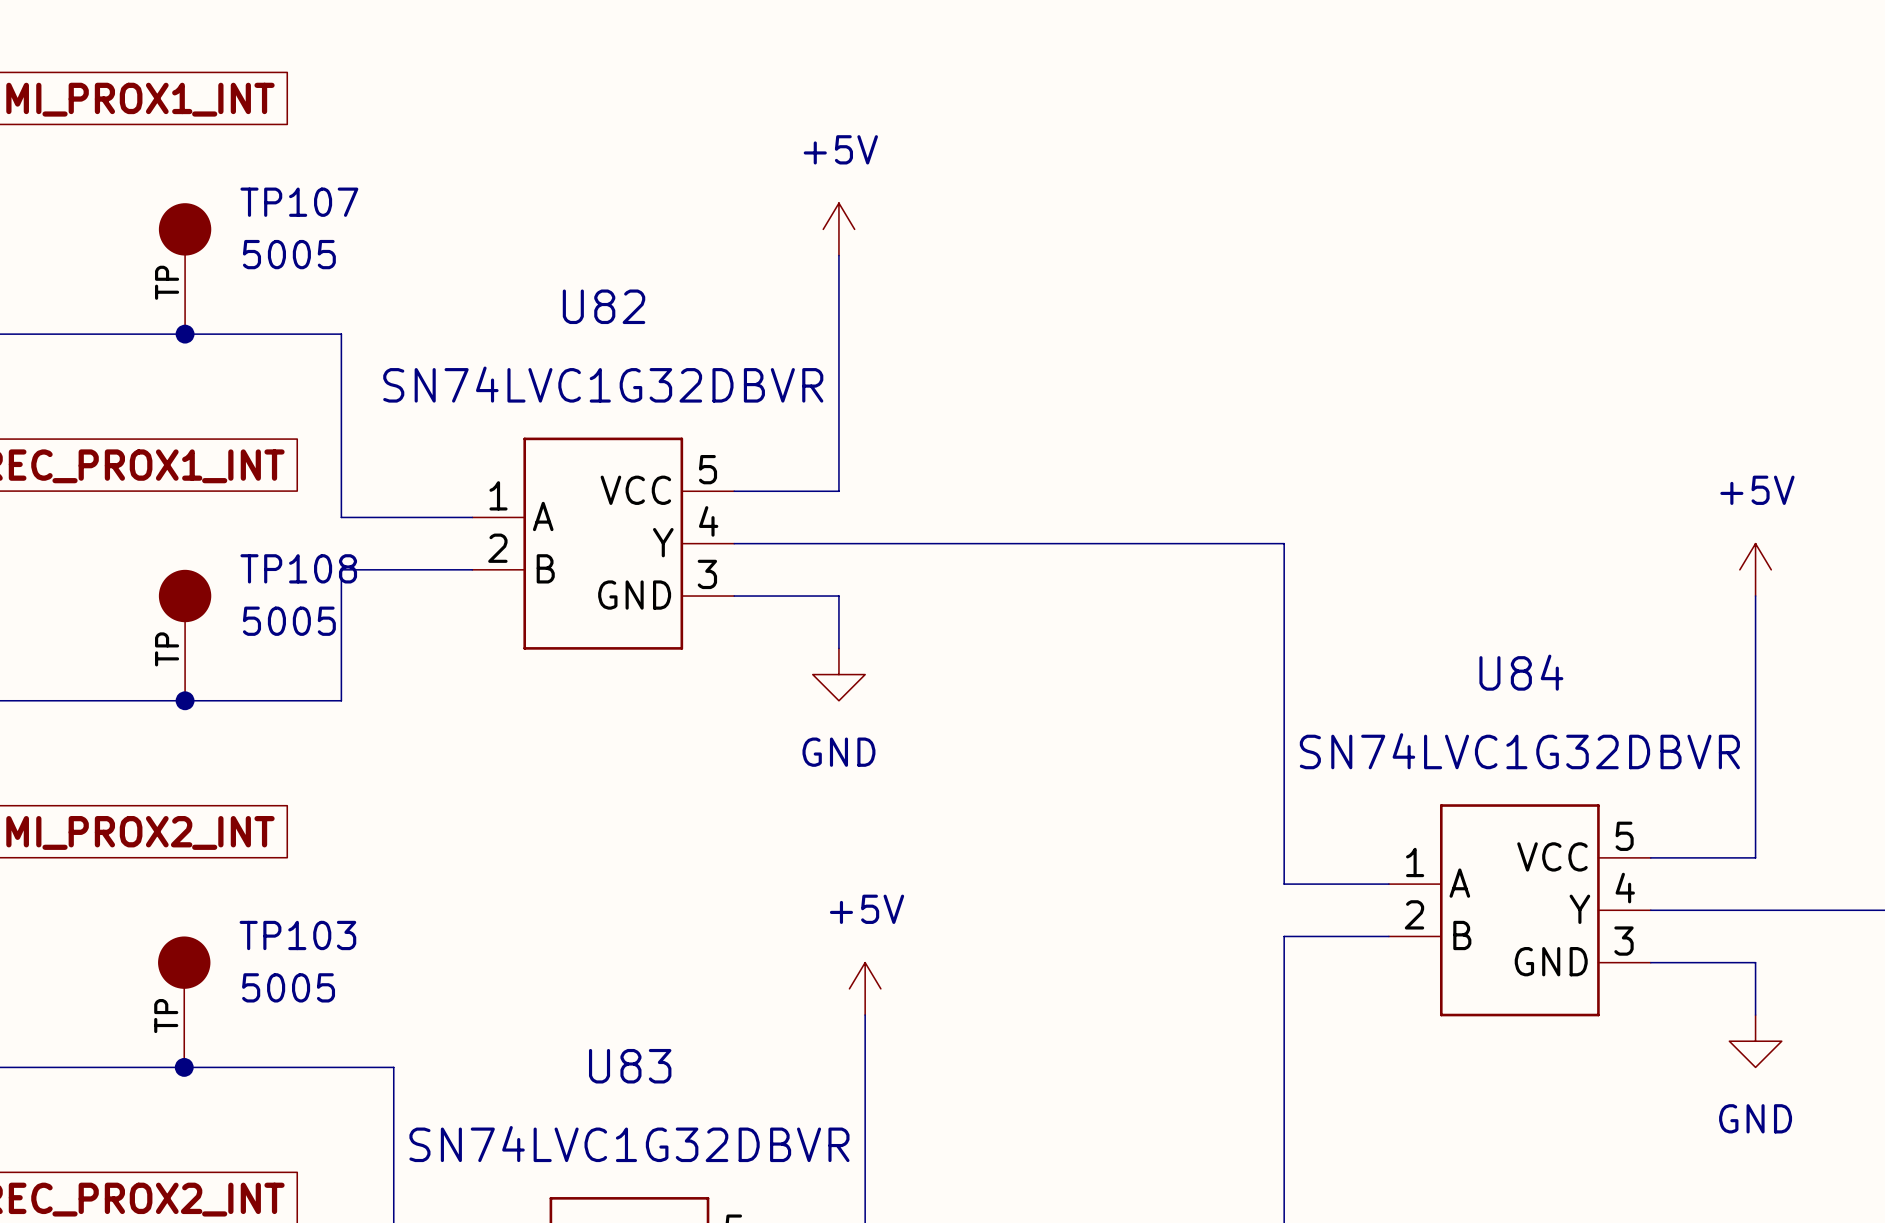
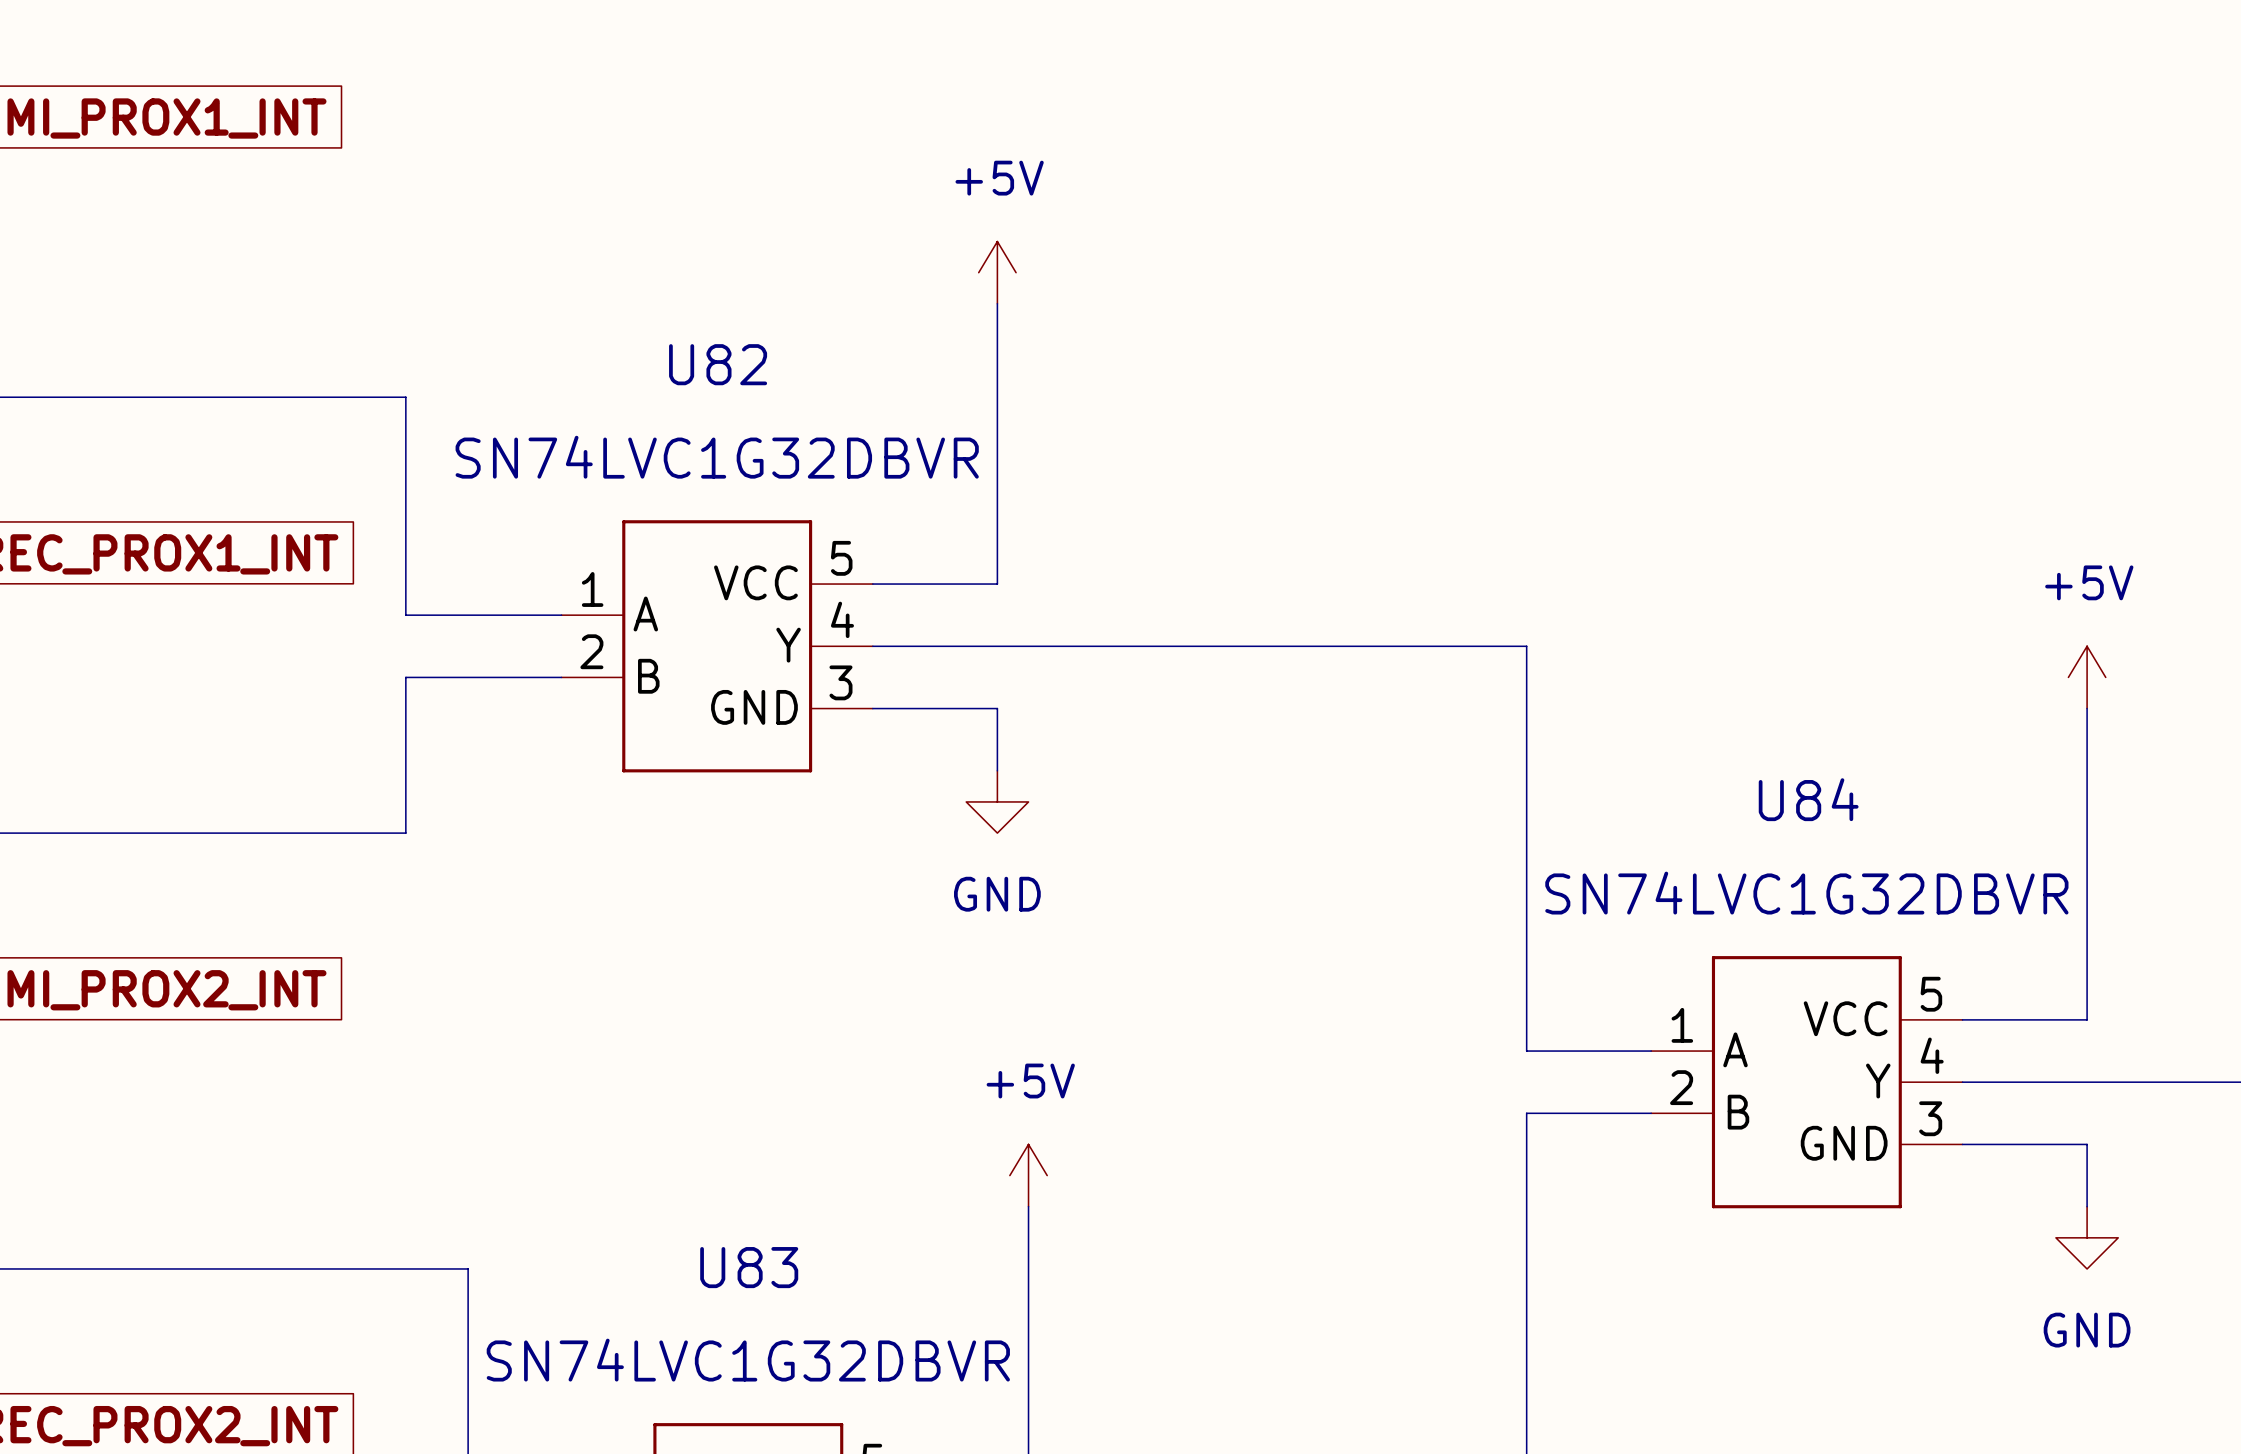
TP107: 5005 (185, 268) -> none
junction: (185, 334) -> none
TP108: 5005 (185, 635) -> none
junction: (185, 700) -> none
TP103: 5005 (184, 1001) -> none
junction: (184, 1067) -> none

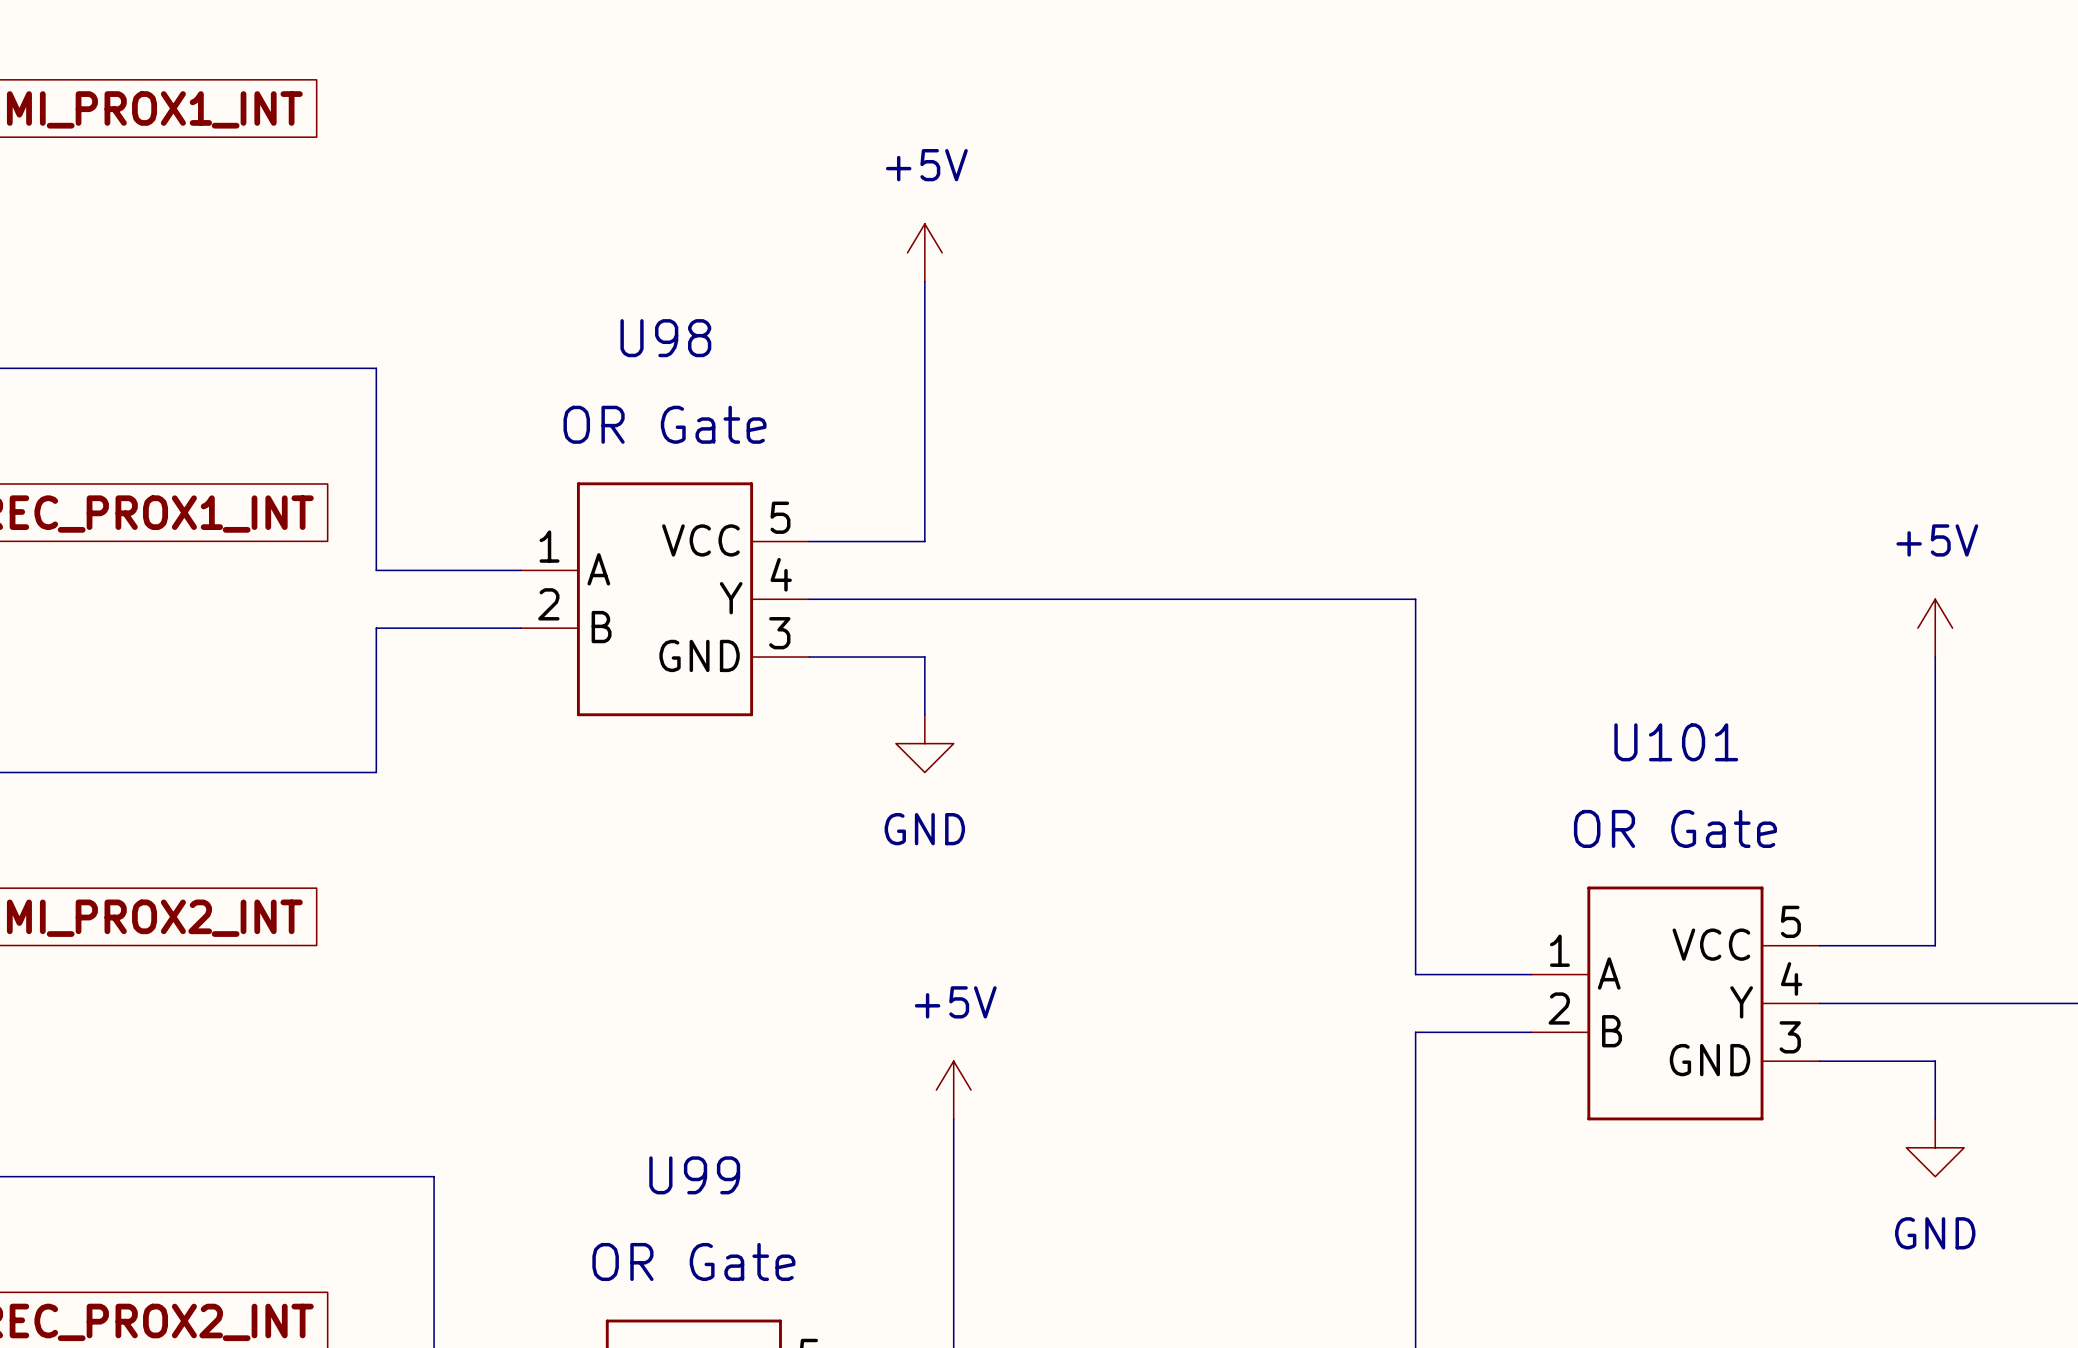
U82 name: U82 (718, 364) -> U98 (665, 338)
U82 value: SN74LVC1G32DBVR (717, 457) -> OR Gate (665, 424)
U84 name: U84 (1808, 799) -> U101 (1676, 742)
U84 value: SN74LVC1G32DBVR (1806, 893) -> OR Gate (1675, 828)
U83 name: U83 (749, 1267) -> U99 (694, 1175)
U83 value: SN74LVC1G32DBVR (748, 1360) -> OR Gate (693, 1261)

